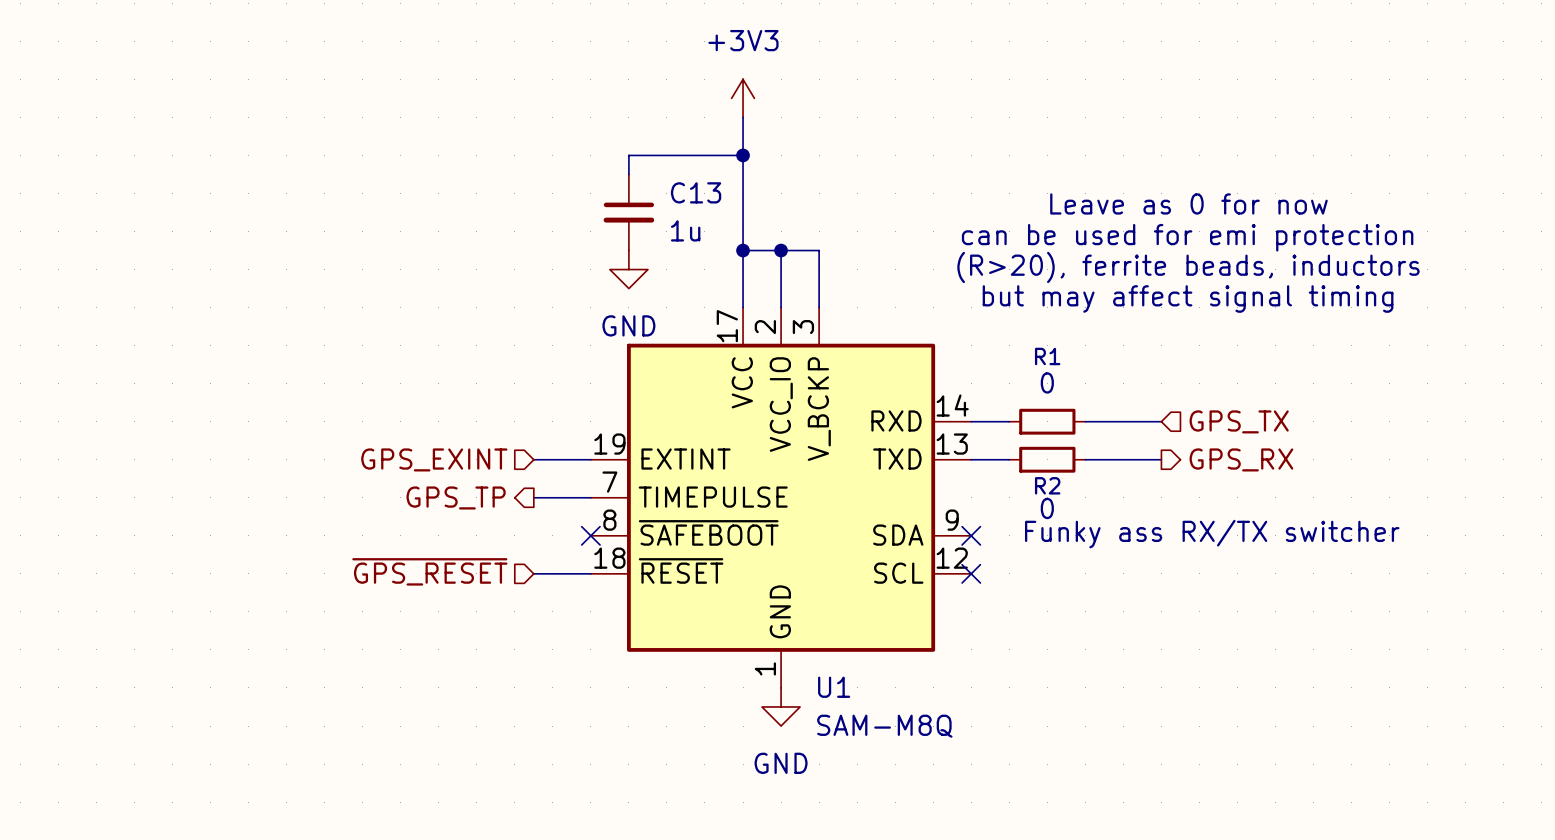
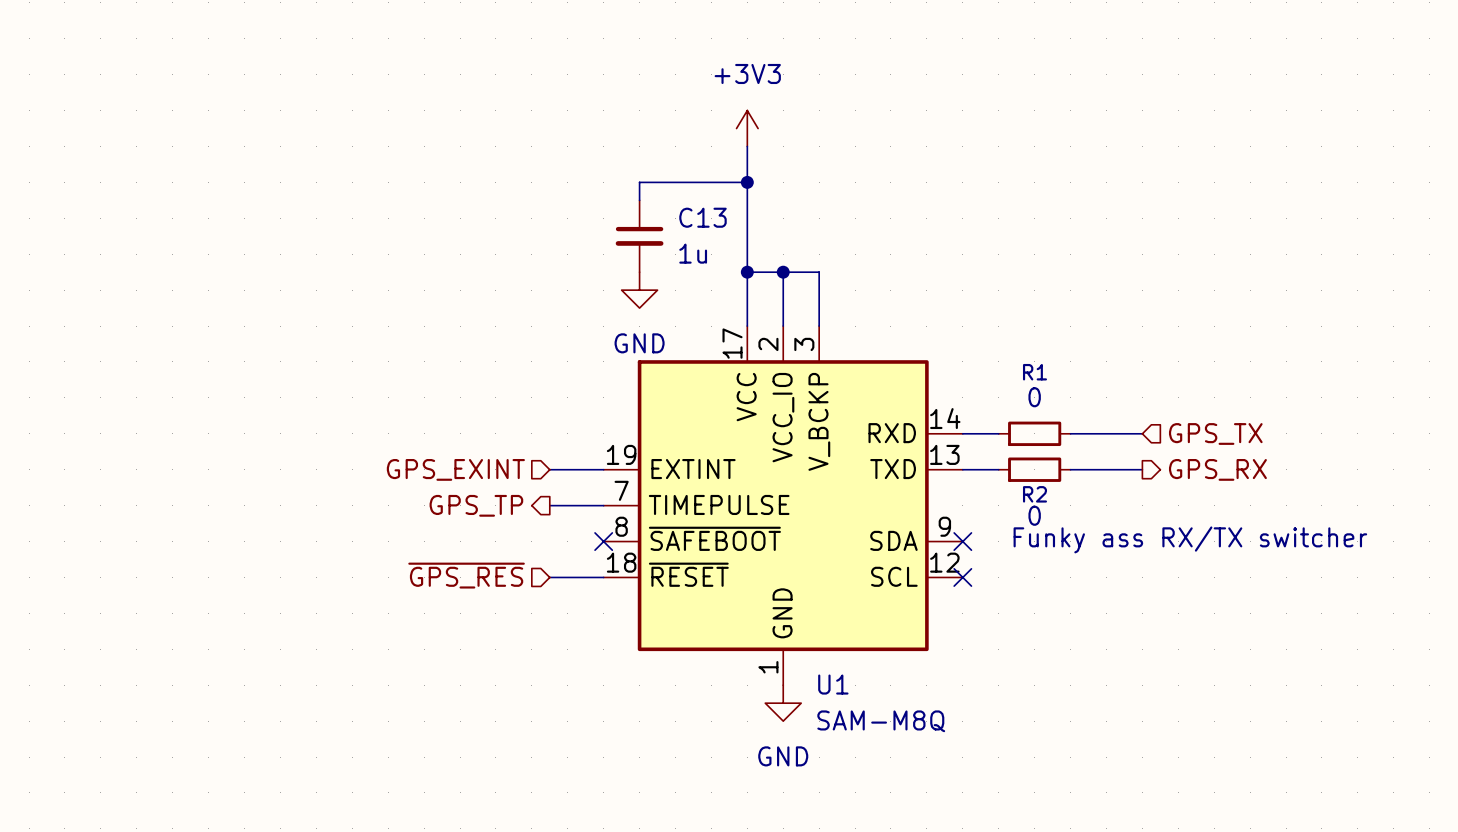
text: Leave as 0 for now (1188, 203) -> none
text: can be used for emi protection (1187, 237) -> none
text: (R>20), ferrite beads, inductors (1188, 267) -> none
text: but may affect signal timing (1188, 298) -> none
hierarchical label: ~{GPS_RESET} (429, 571) -> ~{GPS_RES} (466, 575)

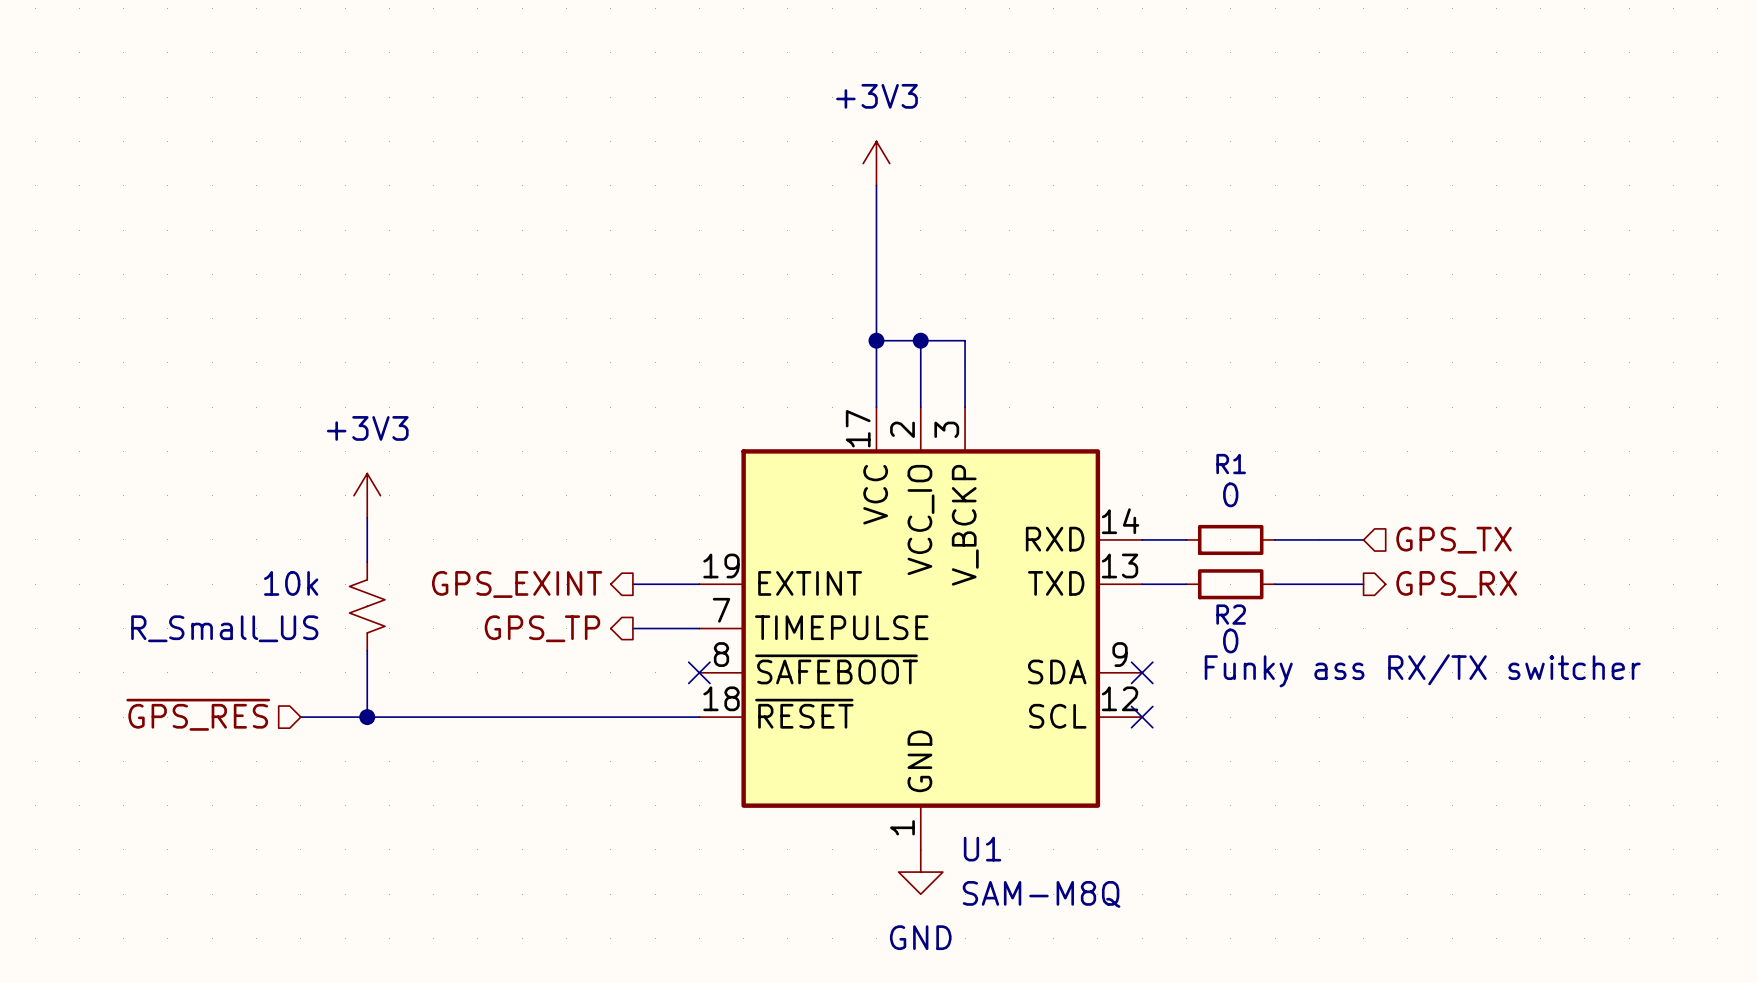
wire: (747, 182) (639, 182) (639, 200) -> none
junction: (747, 182) -> none
C13: 1u (639, 236) -> none
power symbol: GND (639, 290) -> none
power symbol: none -> +3V3 (367, 495)
wire: none -> (367, 517) (367, 562)
hierarchical label shape: input (455, 469) -> output (517, 584)
10k: none -> R_Small_US (367, 606)
wire: none -> (367, 650) (367, 717)
hierarchical label position: ~{GPS_RES} (466, 575) -> ~{GPS_RES} (198, 714)
wire: none -> (300, 717) (632, 717)
junction: none -> (367, 717)

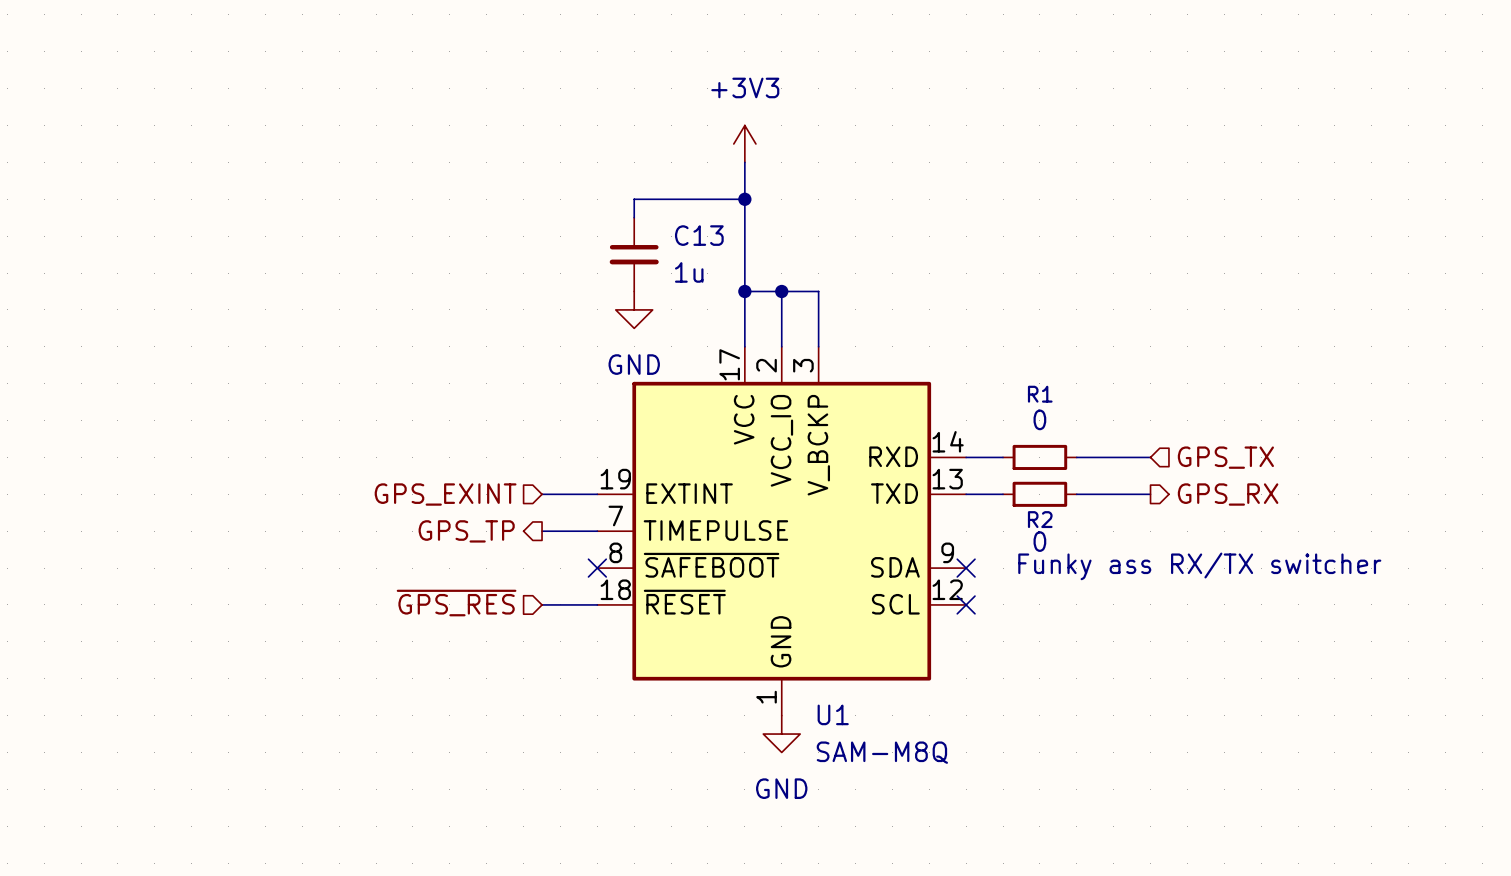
wire: none -> (744, 199) (634, 199) (634, 217)
junction: none -> (744, 199)
C13: none -> 1u (634, 254)
power symbol: none -> GND (634, 309)
power symbol: +3V3 (367, 495) -> none
wire: (367, 517) (367, 562) -> none
hierarchical label shape: output (517, 584) -> input (445, 494)
10k: R_Small_US (367, 606) -> none
wire: (367, 650) (367, 717) -> none
hierarchical label position: ~{GPS_RES} (198, 714) -> ~{GPS_RES} (456, 603)
wire: (300, 717) (632, 717) -> none
junction: (367, 717) -> none

